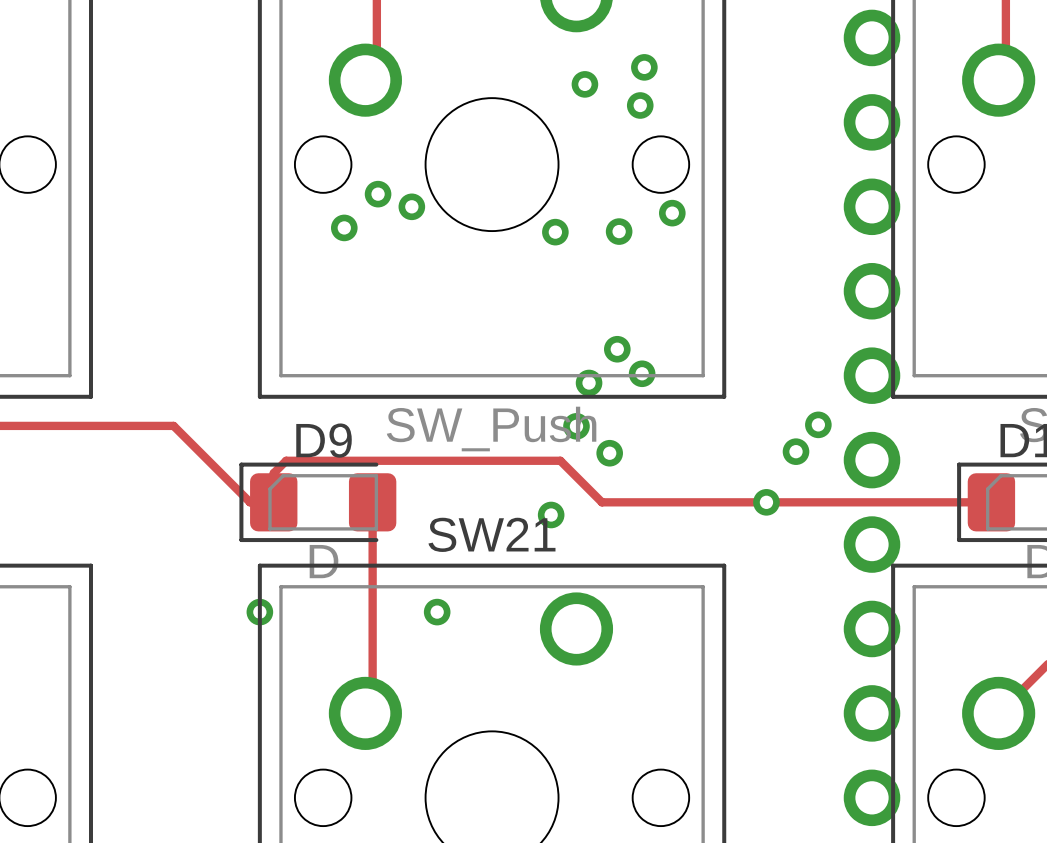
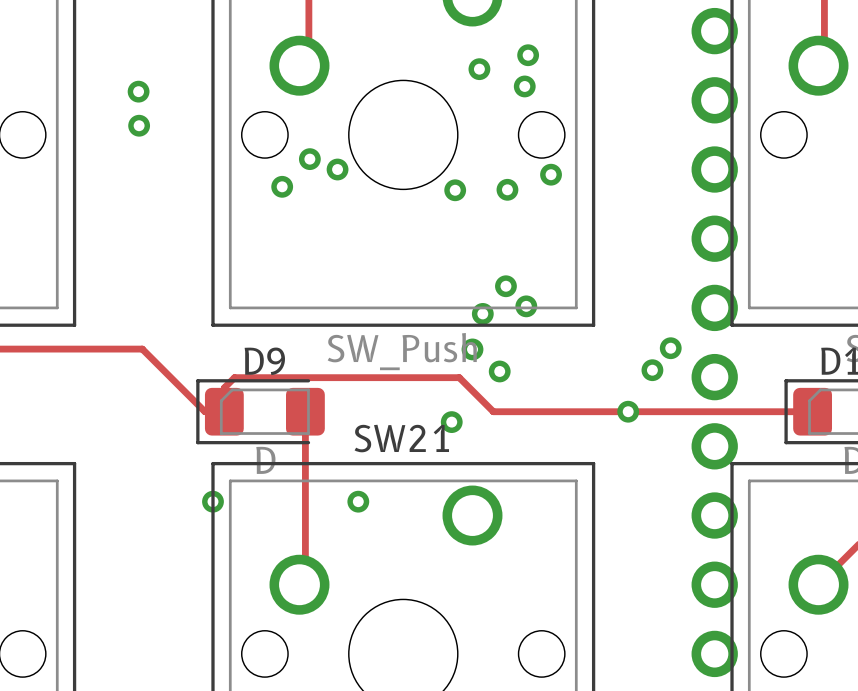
via: none -> (138, 91)
via: none -> (139, 125)

